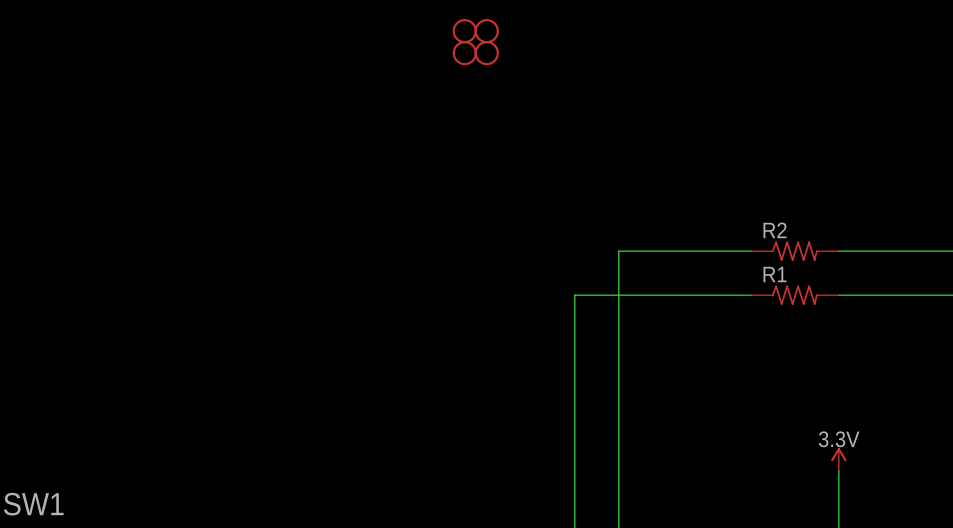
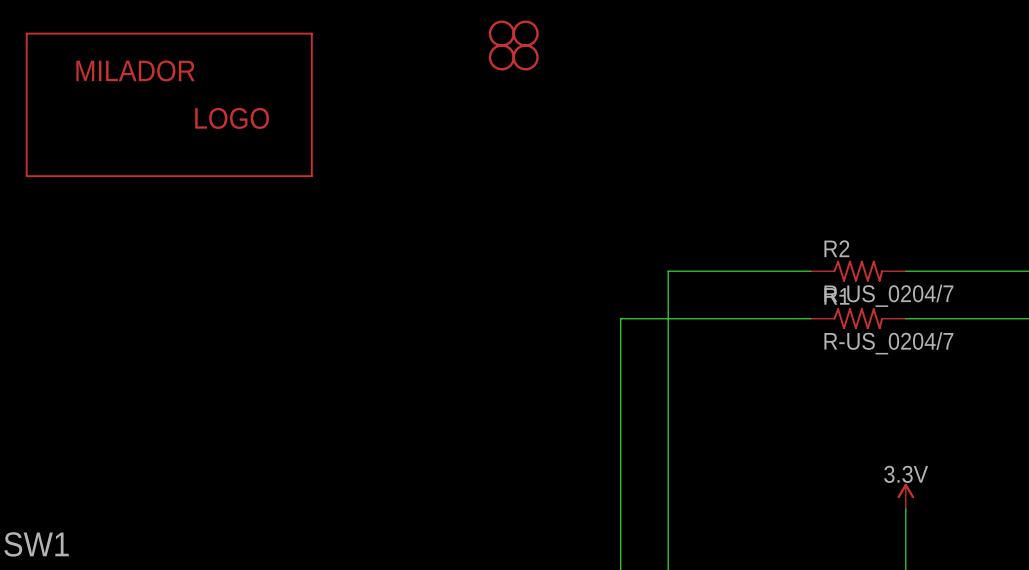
part: none -> (169, 104)
R2 value: none -> R-US_0204/7 (888, 295)
R1 value: none -> R-US_0204/7 (888, 343)

